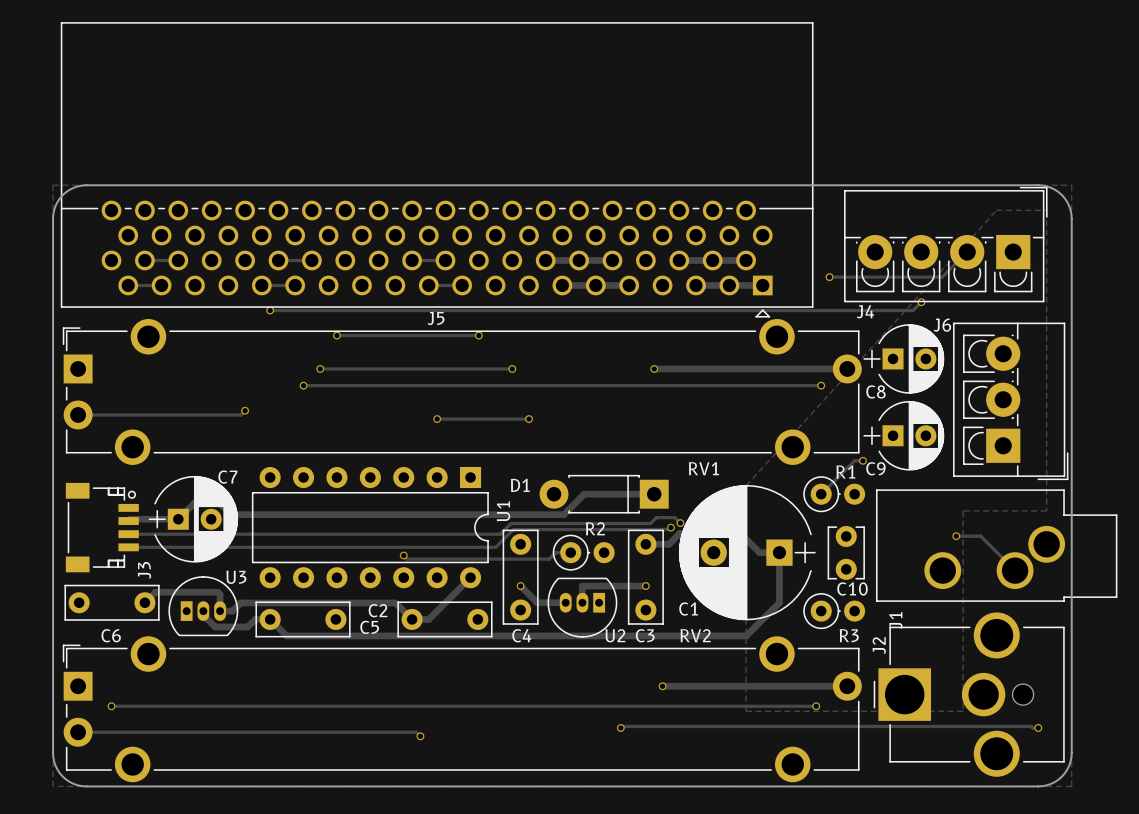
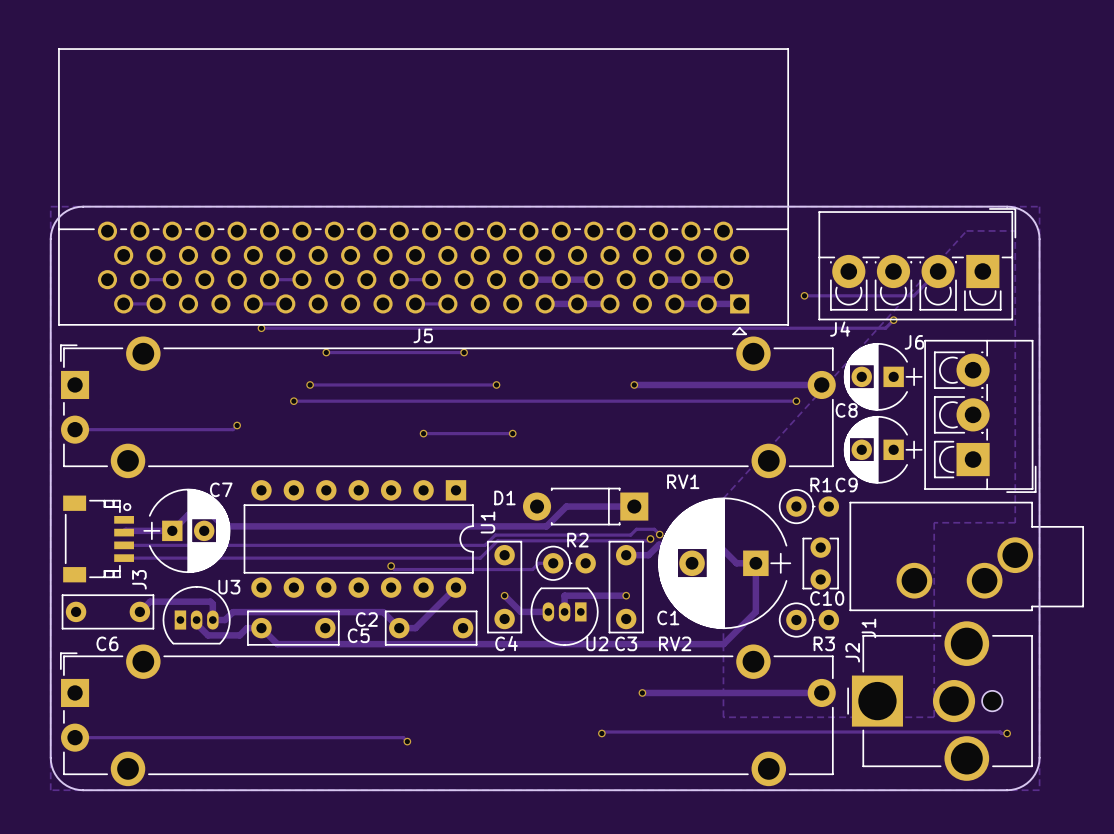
C8 rotation: 0° (903, 358) -> 180° (883, 376)
C9 rotation: 0° (903, 435) -> 180° (883, 449)
track: (862, 460) (854, 460) (821, 494) -> none
via: (862, 460) -> none
track: (956, 536) (980, 536) (1015, 570) -> none
via: (956, 536) -> none
track: (111, 706) (816, 706) -> none
via: (111, 706) -> none
via: (816, 706) -> none

